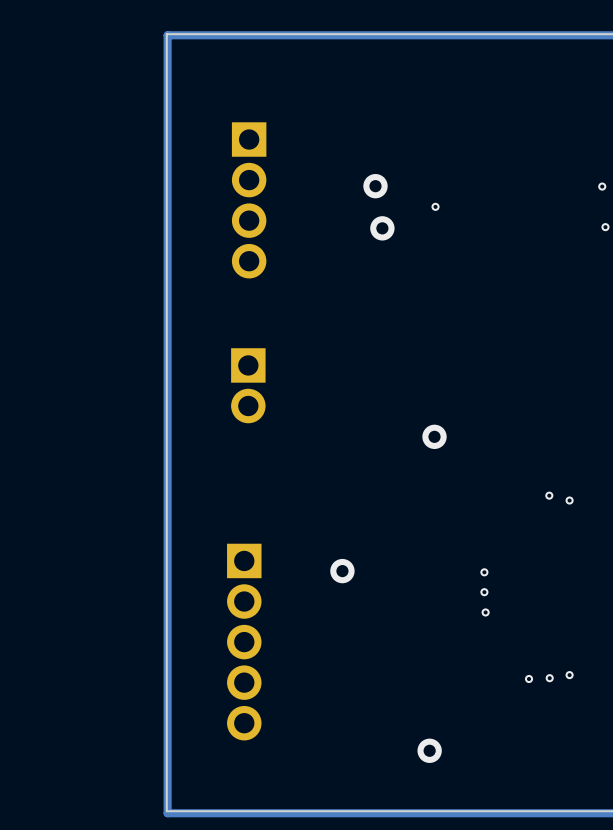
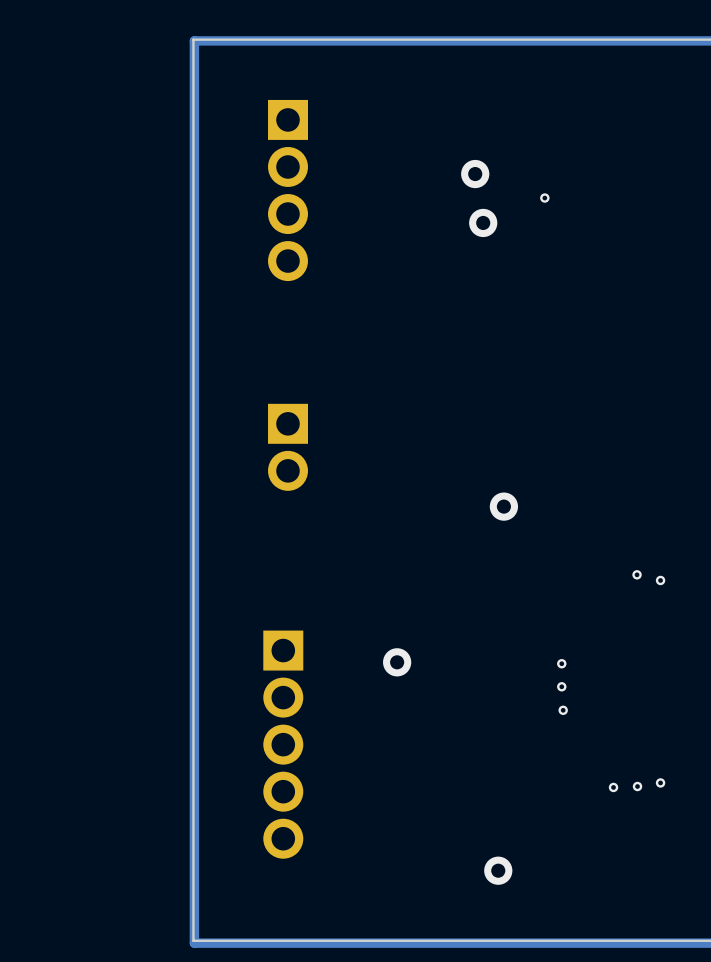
via: none -> (475, 174)
via: (375, 186) -> none
via: (602, 186) -> none
via: none -> (483, 222)
part position: (249, 200) -> (288, 190)
via position: (435, 206) -> (544, 198)
via: (605, 227) -> none
via: (382, 228) -> none

